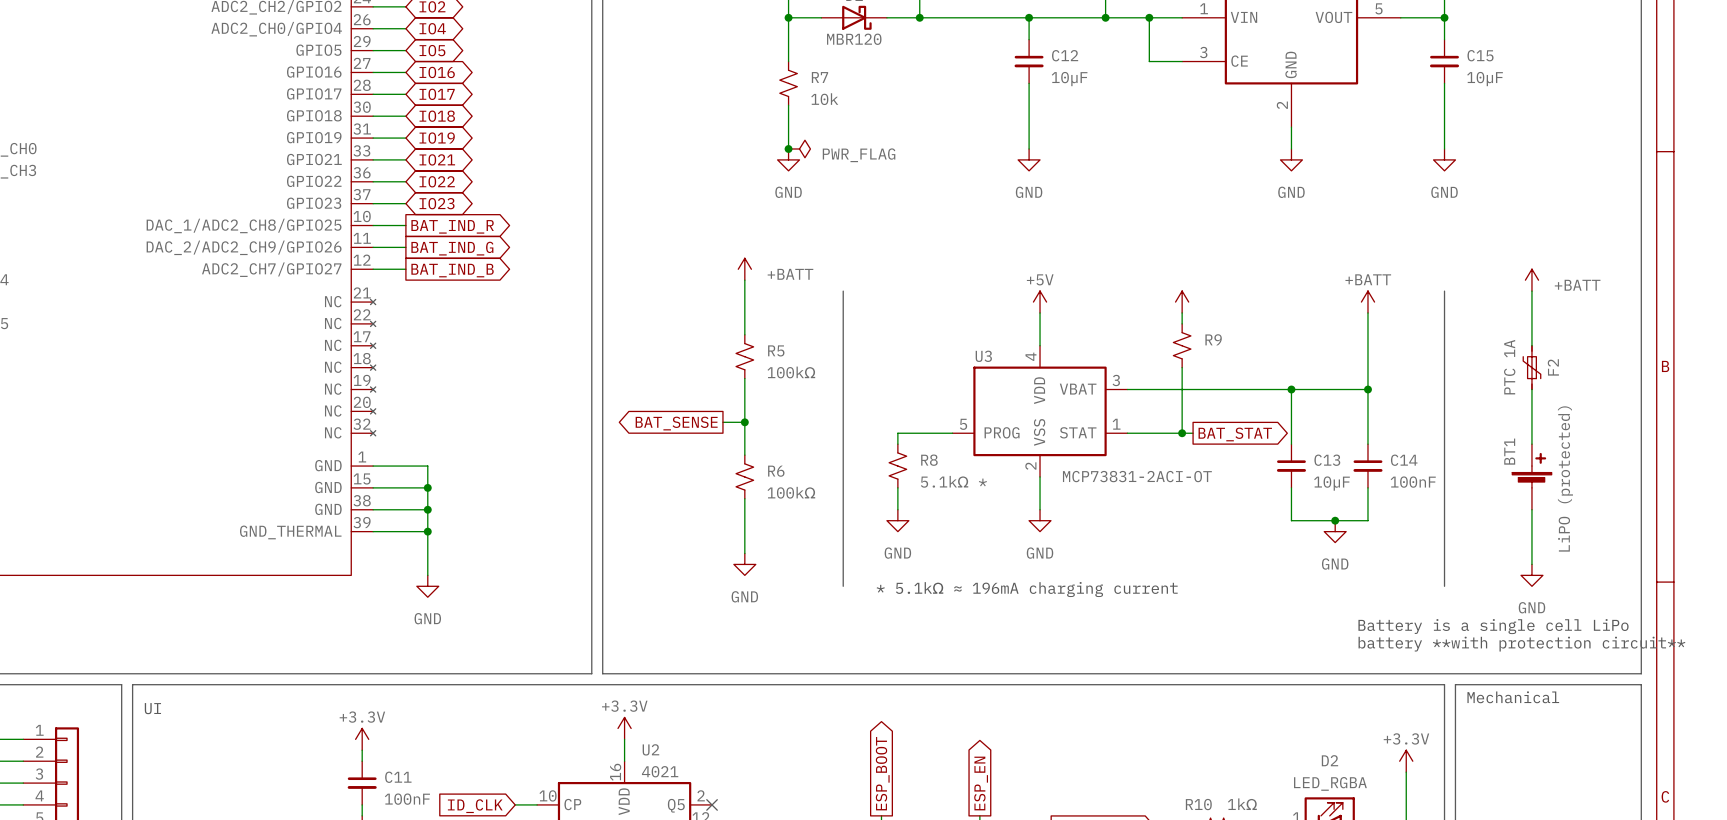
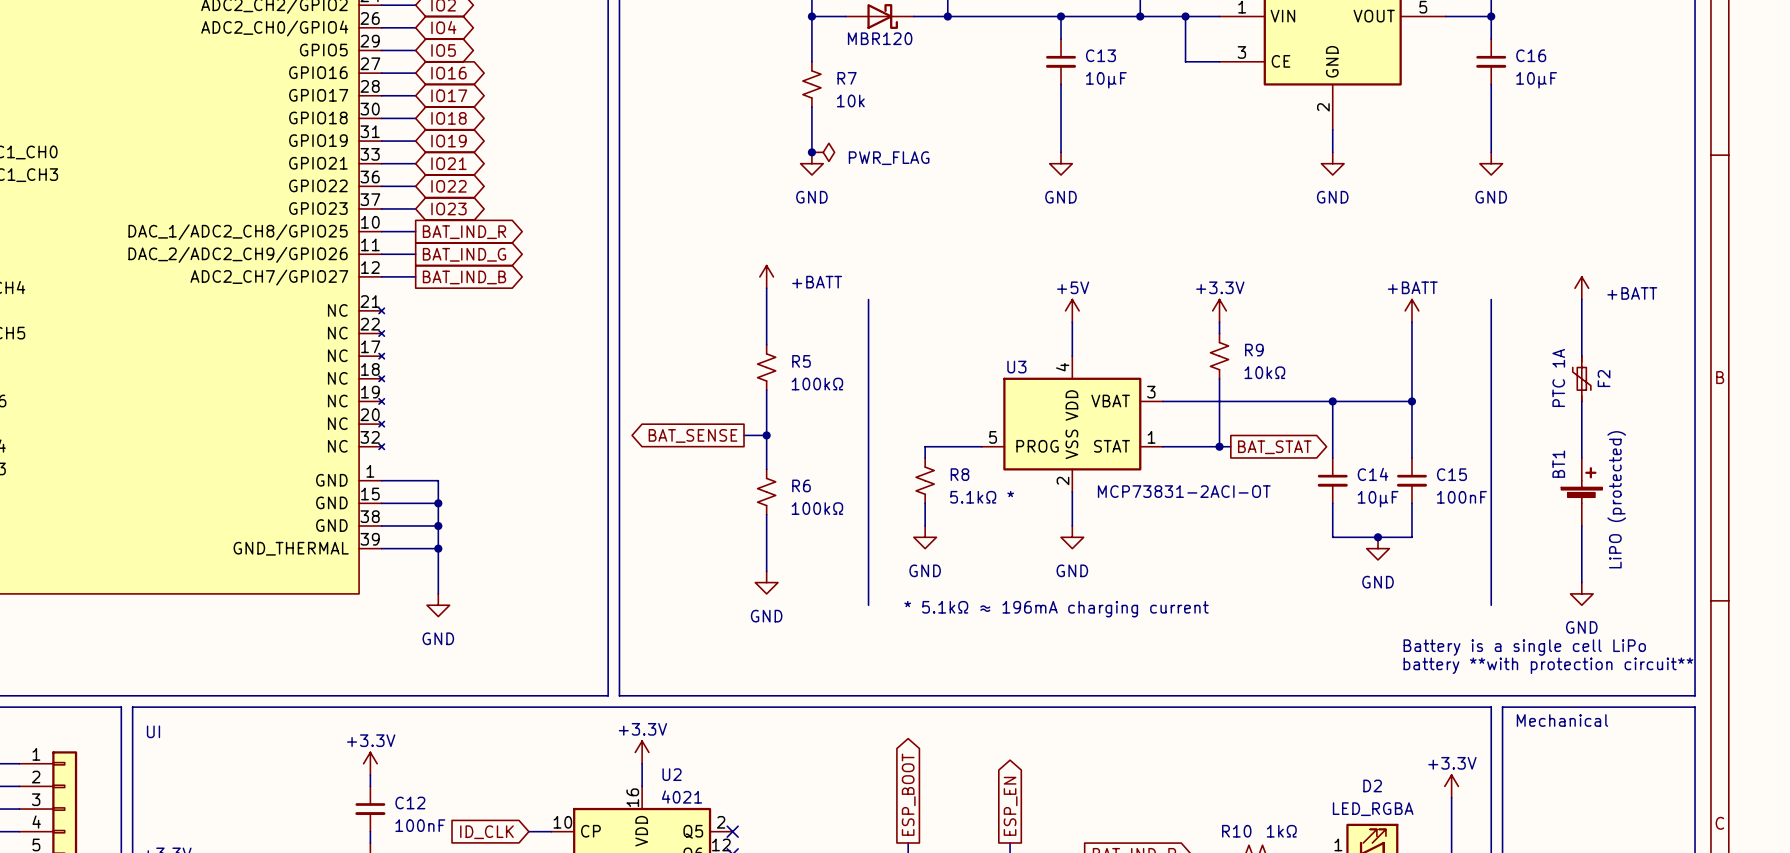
C12 name: C12 (1065, 55) -> C13 (1100, 55)
C15 name: C15 (1480, 55) -> C16 (1531, 55)
power symbol text: none -> +3.3V (1220, 287)
R9 value: none -> 10kΩ (1264, 372)
C13 name: C13 (1327, 460) -> C14 (1372, 474)
C14 name: C14 (1404, 460) -> C15 (1451, 474)
C11 name: C11 (398, 777) -> C12 (410, 803)

